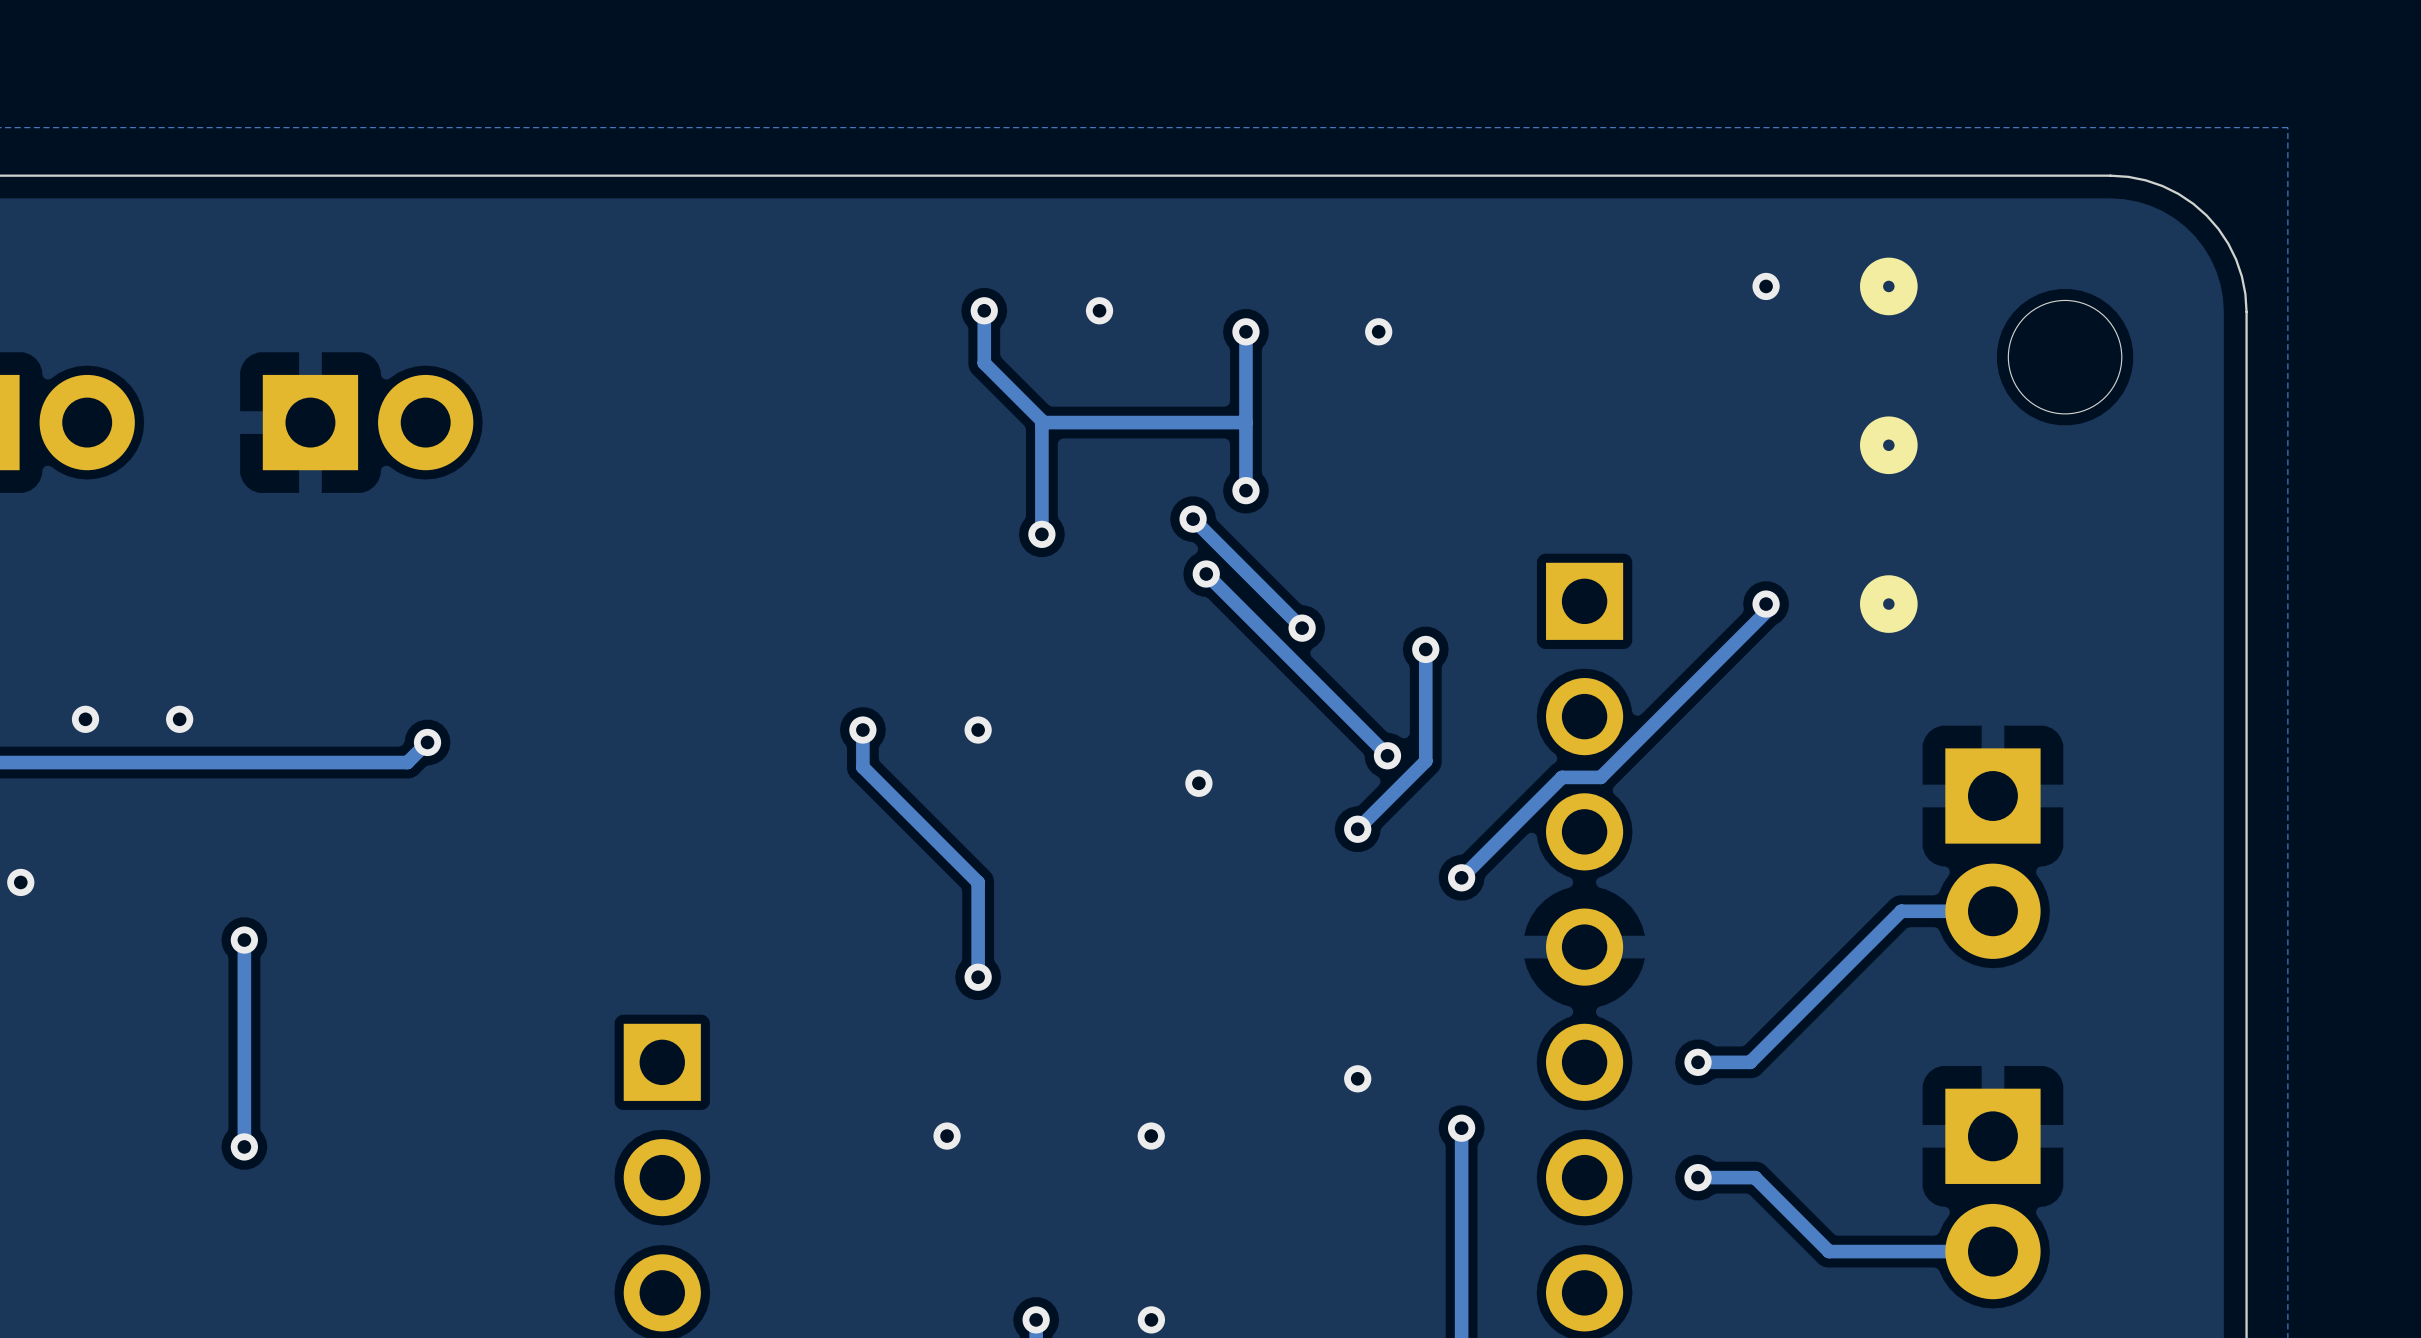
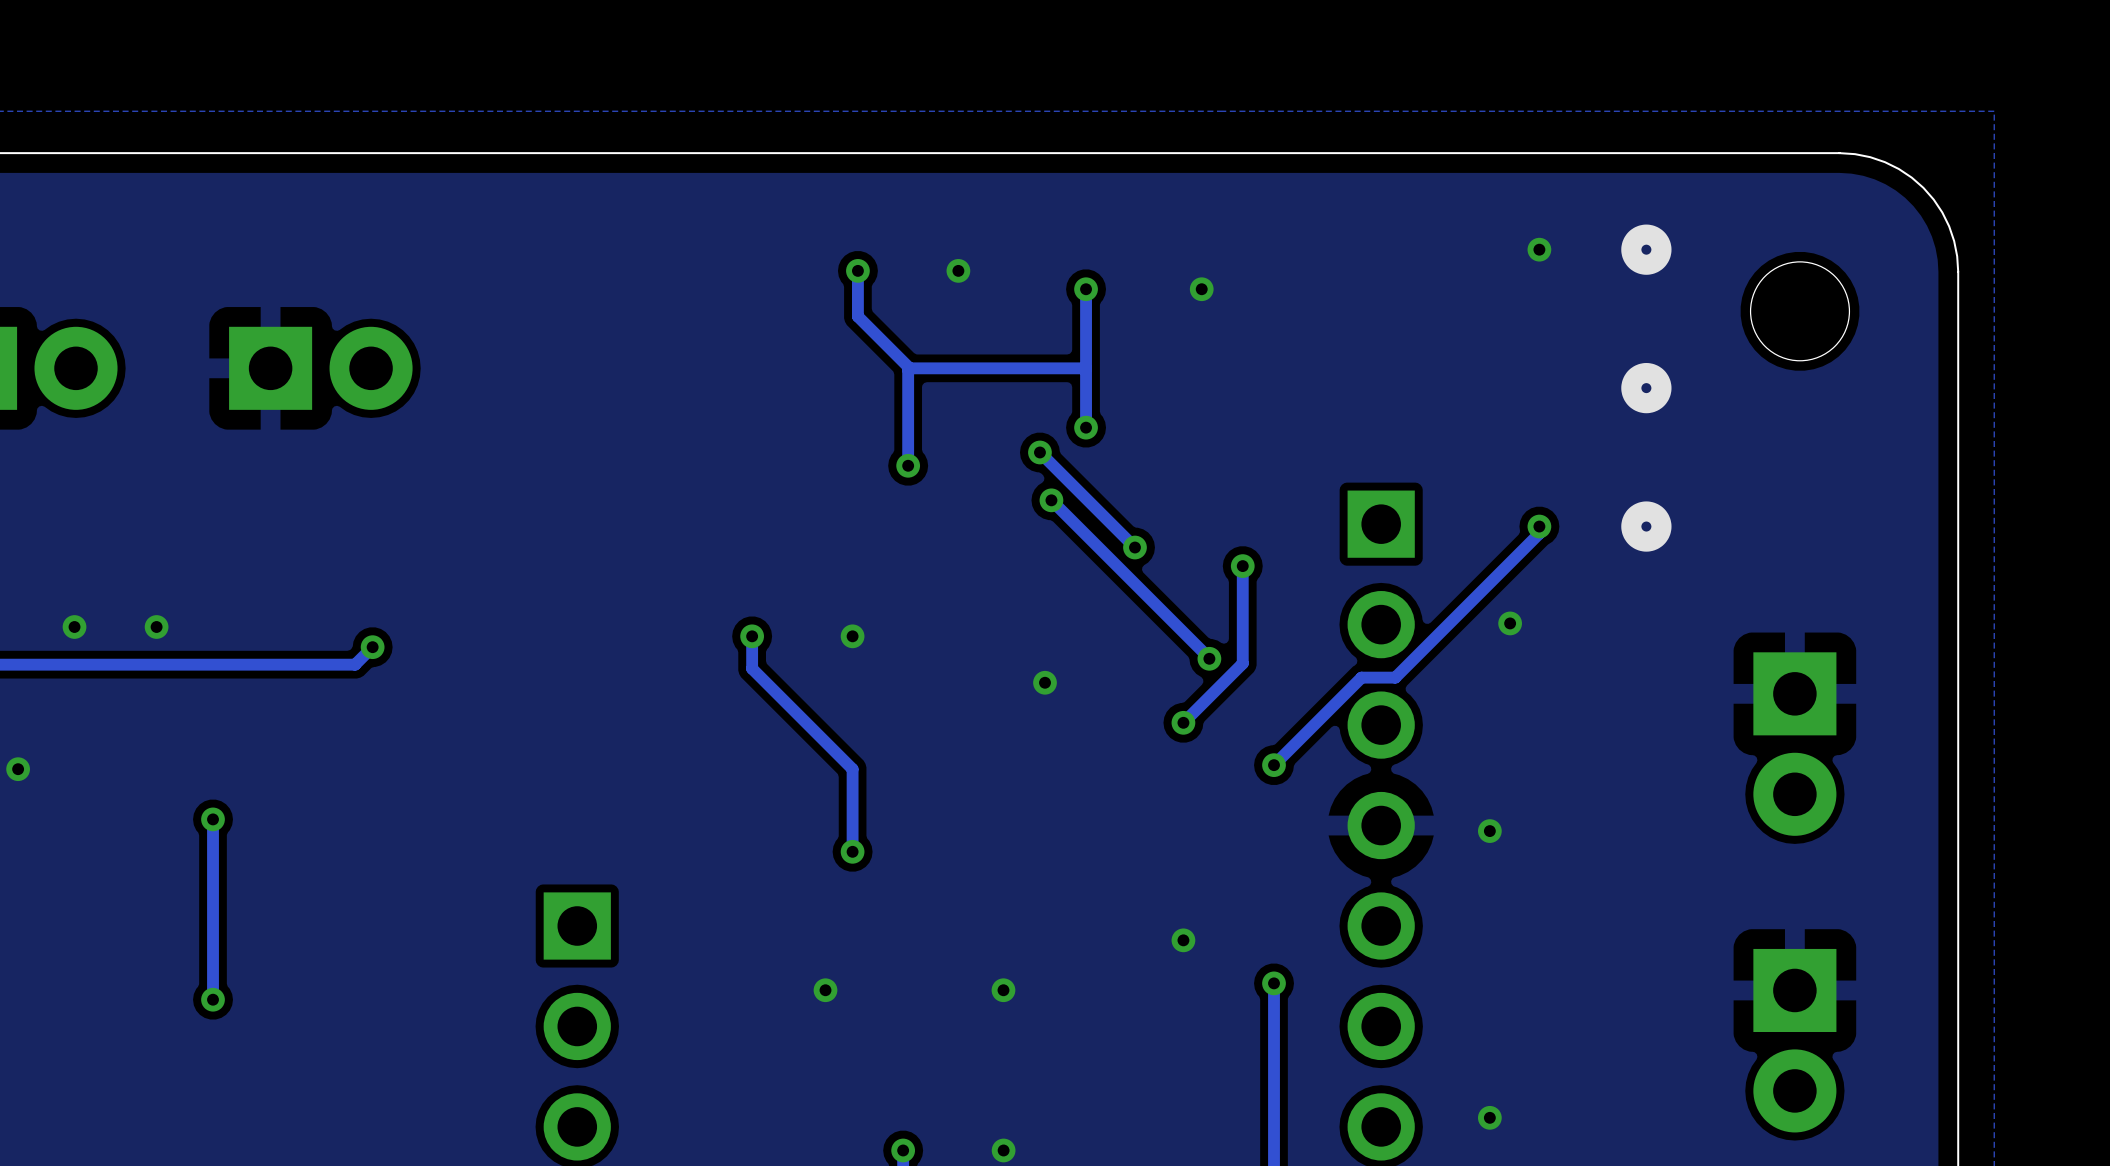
via: none -> (1510, 623)
part position: (1992, 853) -> (1794, 744)
track: (1992, 911) (1901, 911) (1750, 1062) (1698, 1062) -> none
via position: (1698, 1062) -> (1489, 831)
track: (1698, 1177) (1755, 1177) (1829, 1251) (1992, 1251) -> none
via position: (1698, 1177) -> (1489, 1117)
part position: (1992, 1193) -> (1794, 1040)

